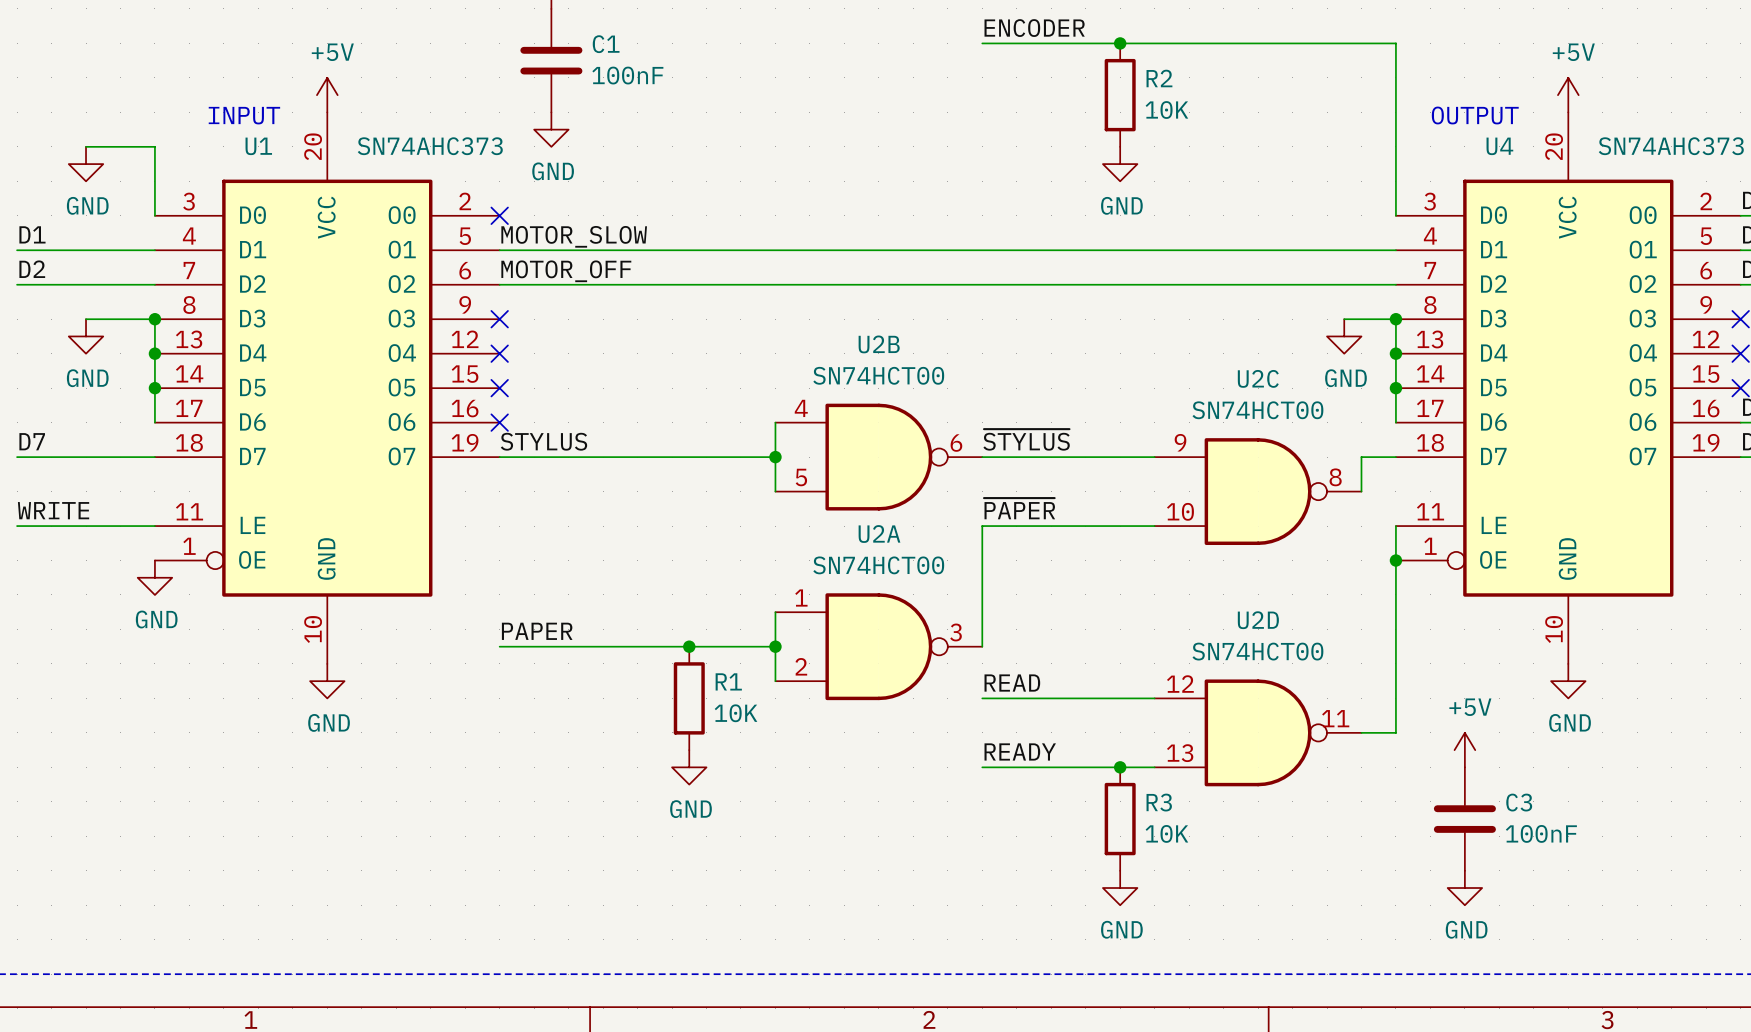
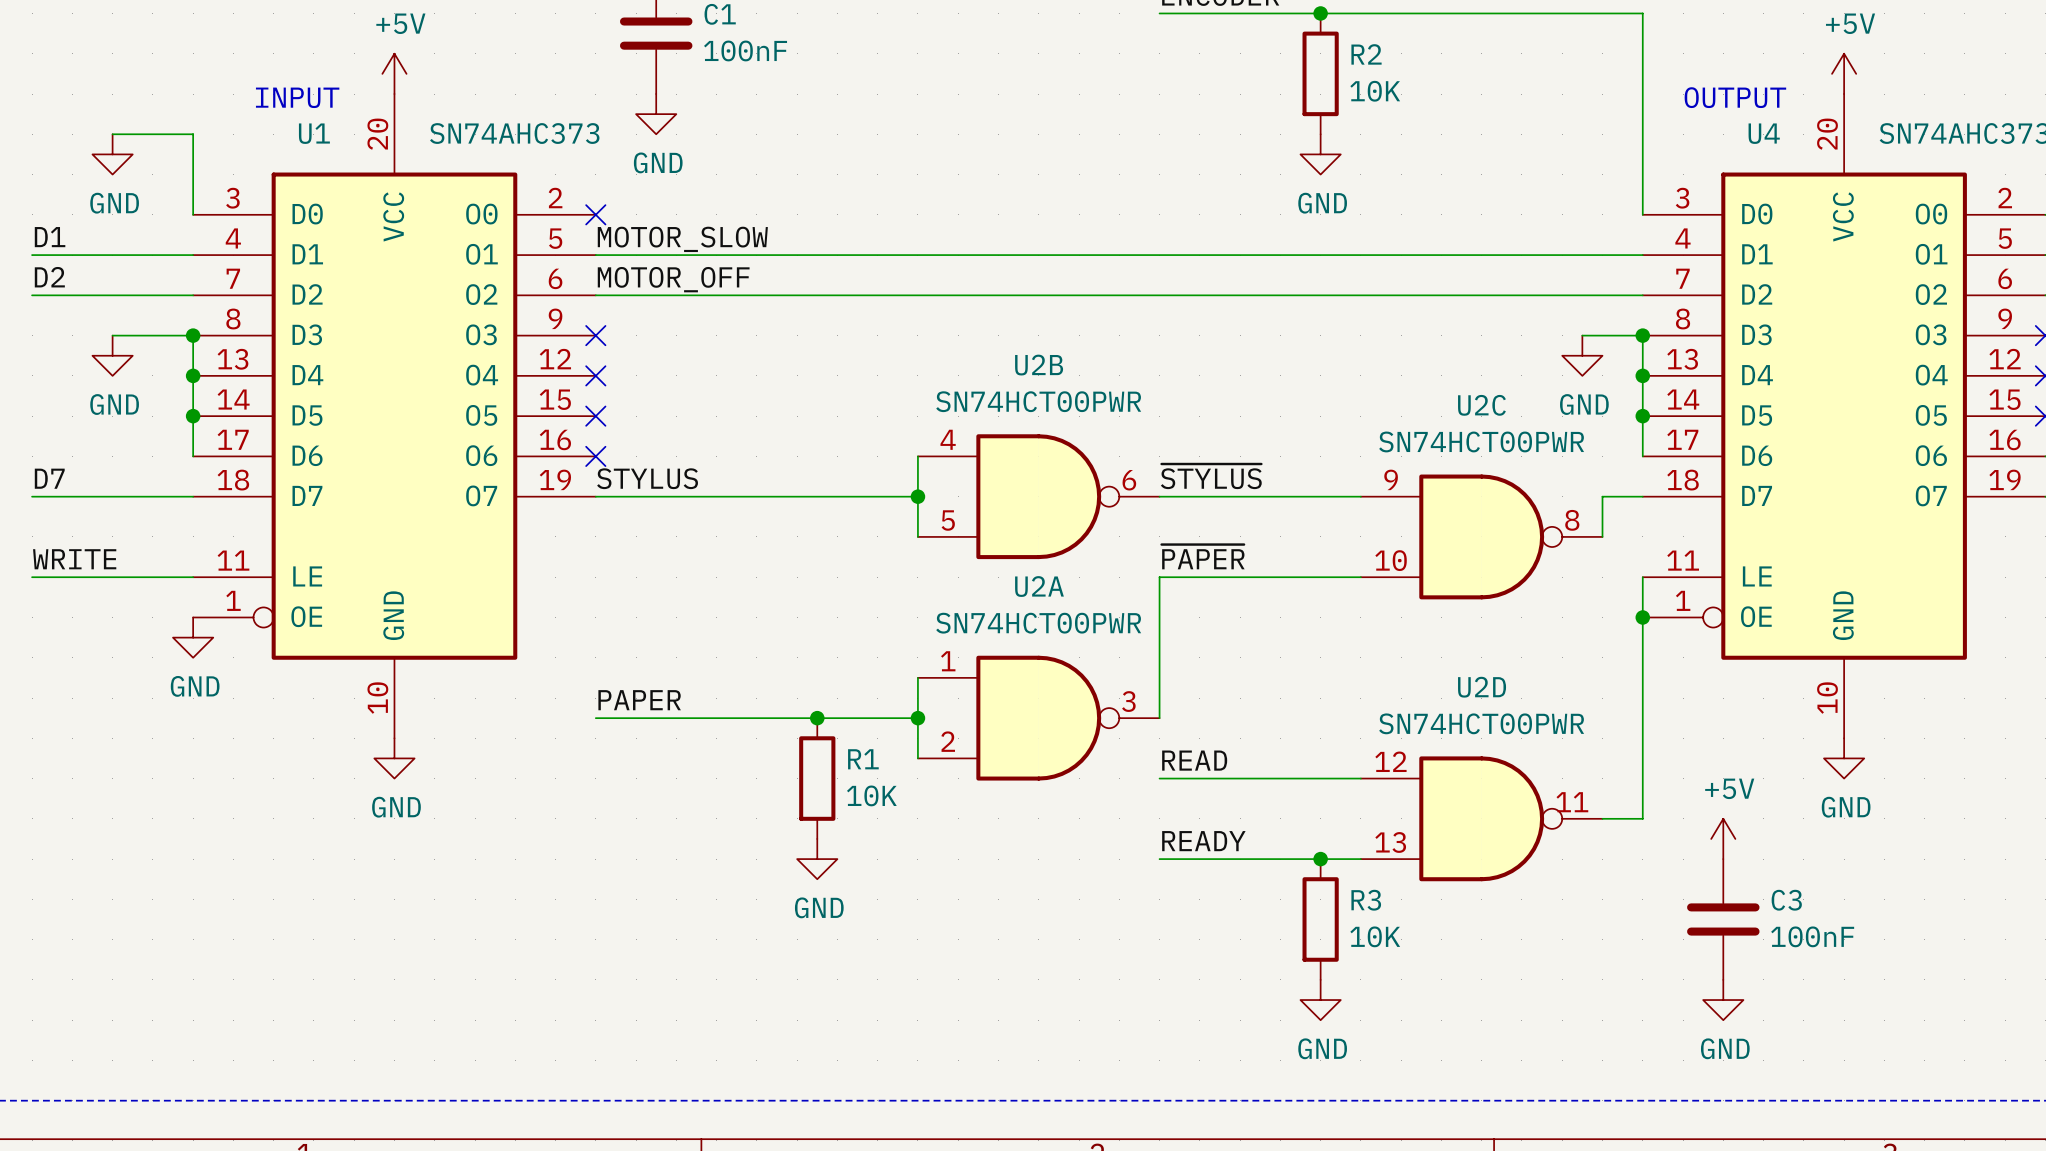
U2B value: SN74HCT00 (878, 375) -> SN74HCT00PWR (1038, 401)
U2C value: SN74HCT00 (1257, 410) -> SN74HCT00PWR (1481, 441)
U2A value: SN74HCT00 (878, 565) -> SN74HCT00PWR (1038, 623)
U2D value: SN74HCT00 (1257, 651) -> SN74HCT00PWR (1481, 723)

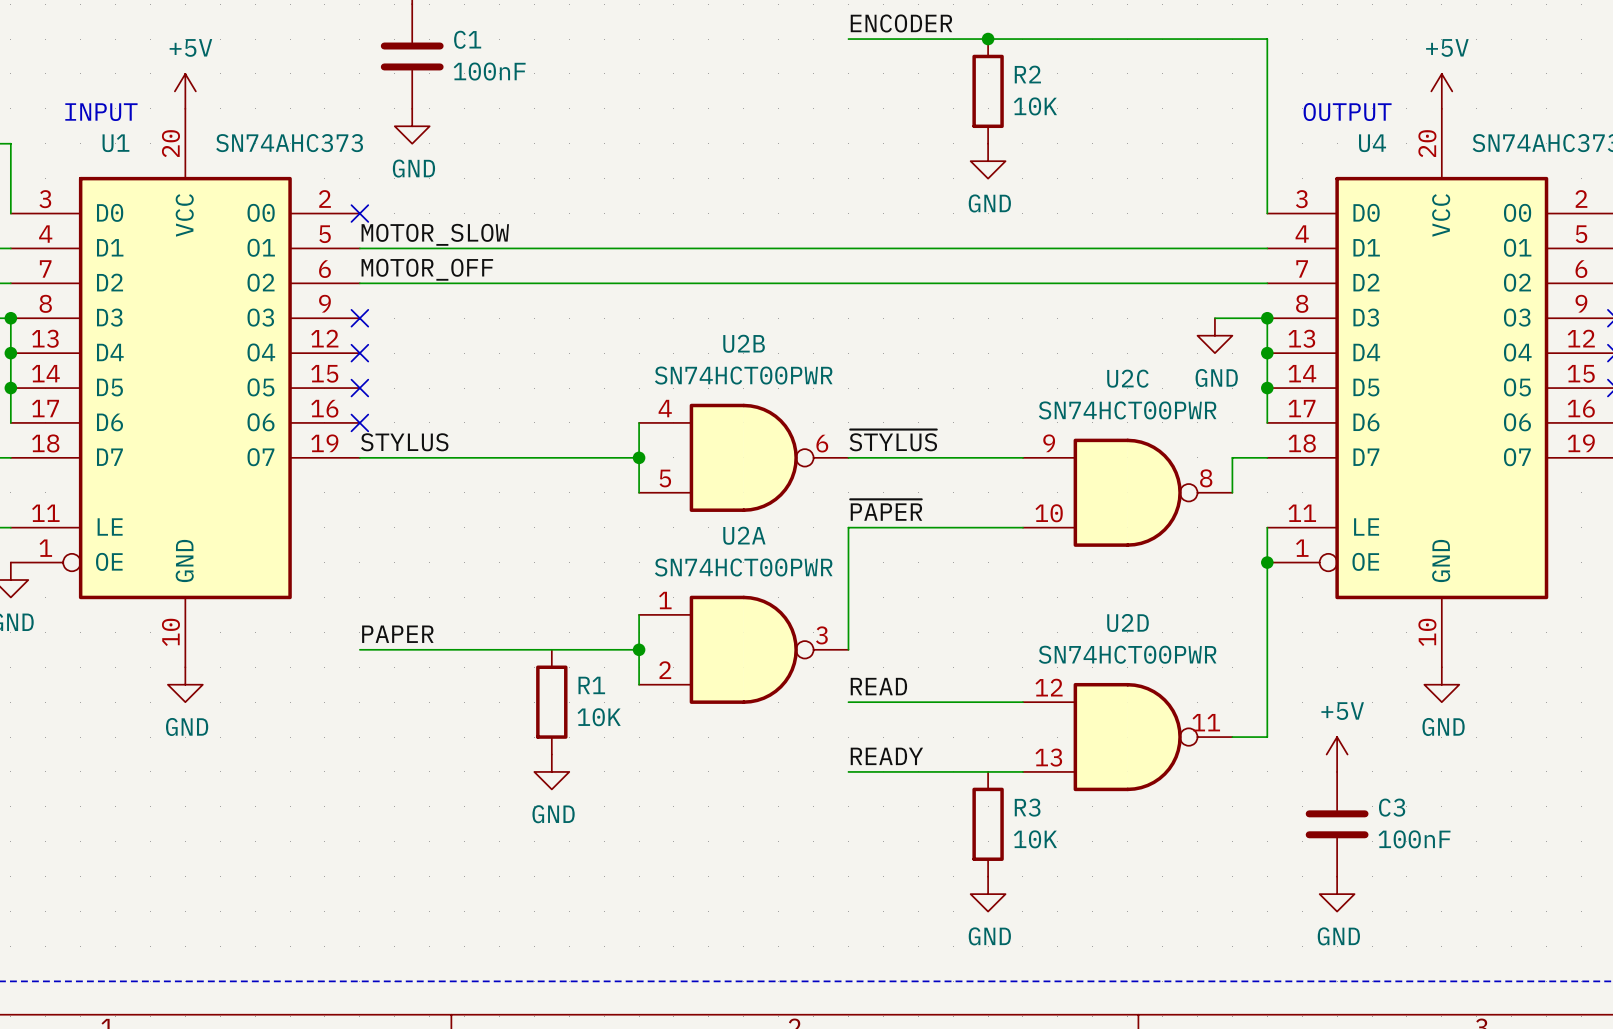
junction: (817, 718) -> none
junction: (1320, 859) -> none

